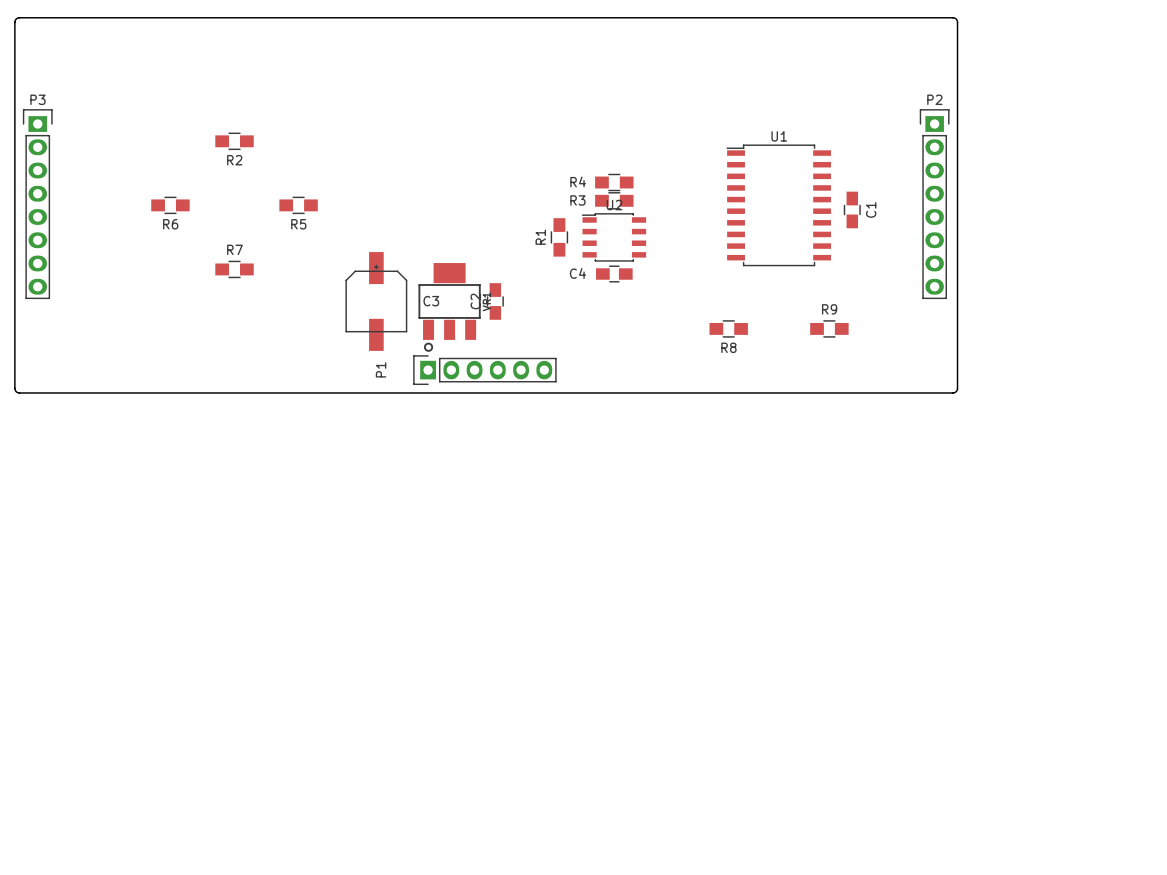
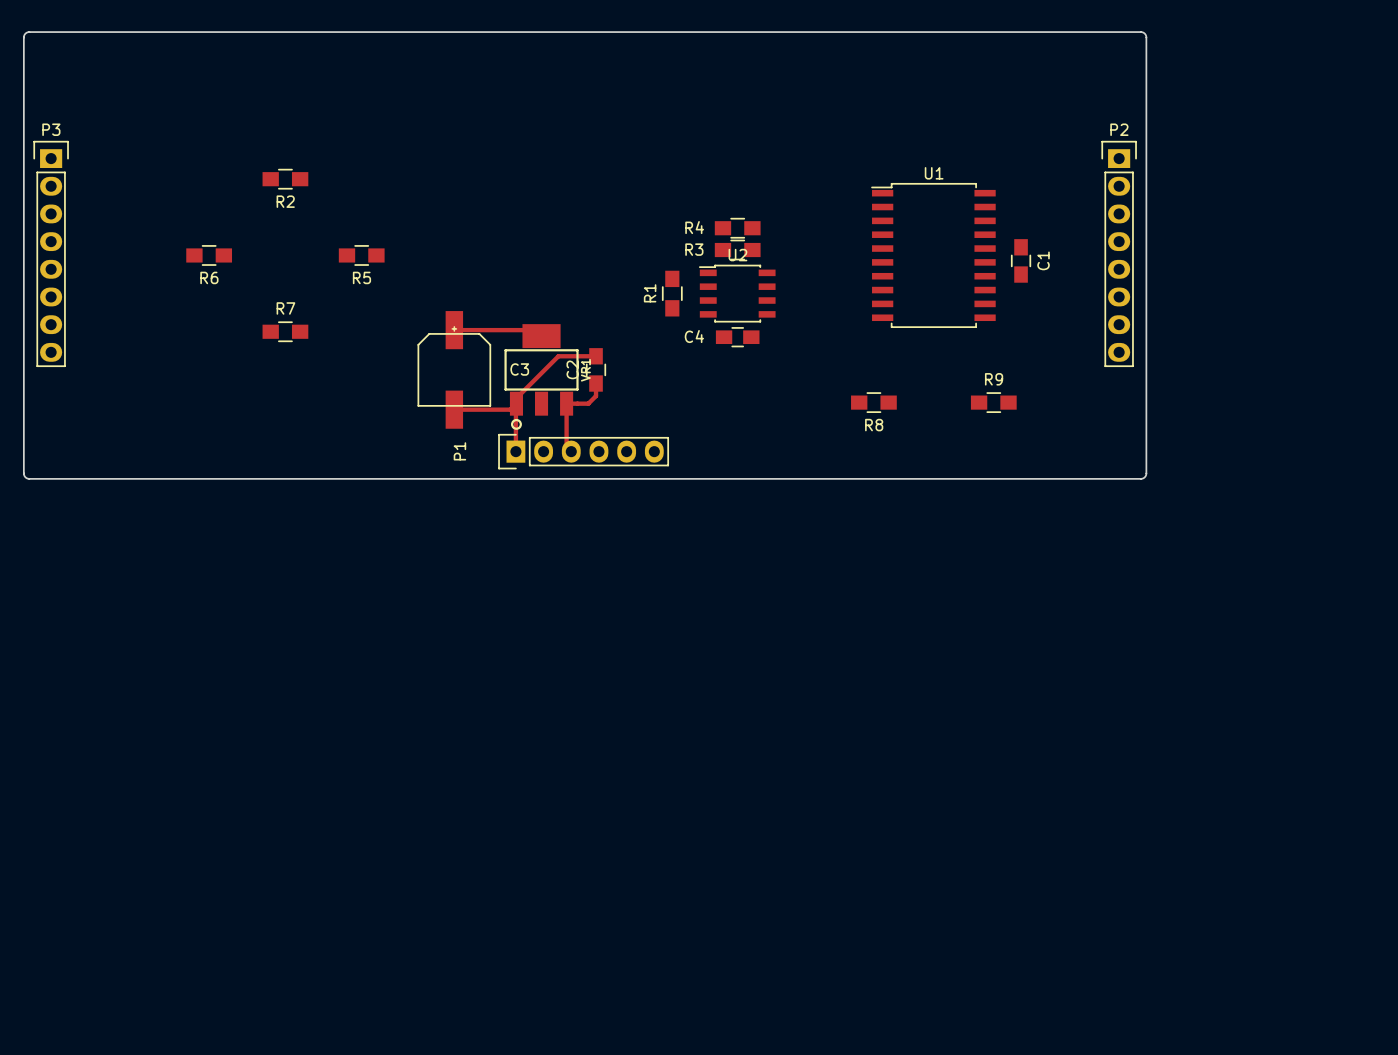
track: none -> (454, 330) (535, 330) (541, 336)
track: none -> (596, 356) (558, 356) (516, 398) (516, 403) (510, 409) (454, 409)
track: none -> (596, 383) (596, 396) (588, 403) (566, 403) (566, 446) (571, 451)
track: none -> (515, 404) (515, 451)

